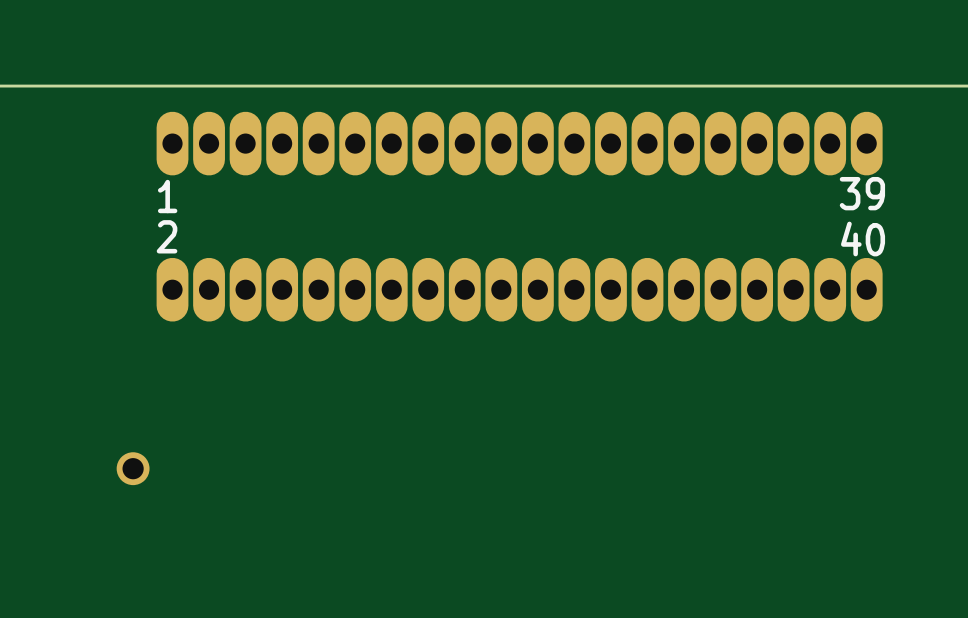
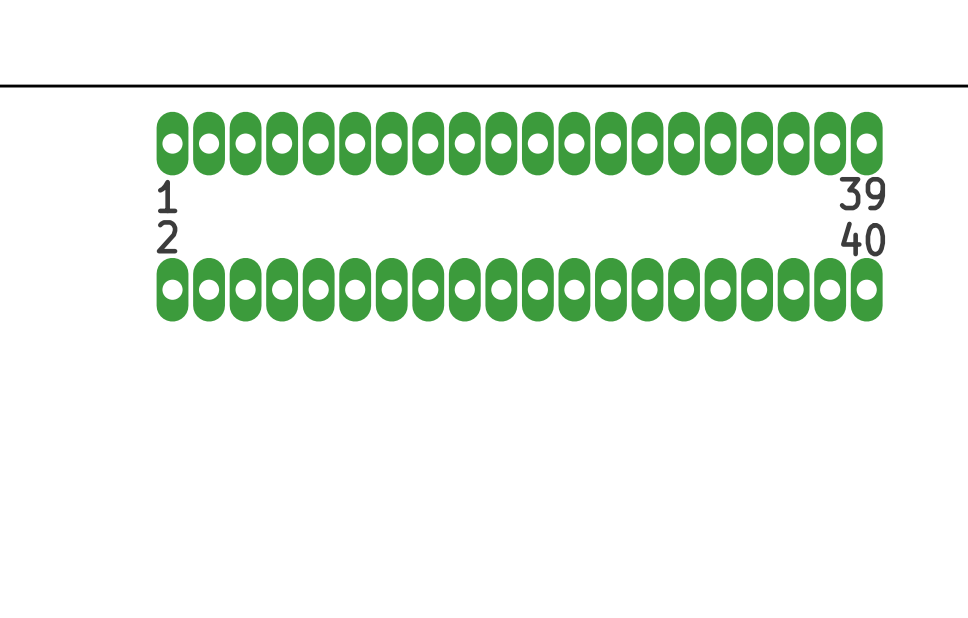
part: (133, 468) -> none

